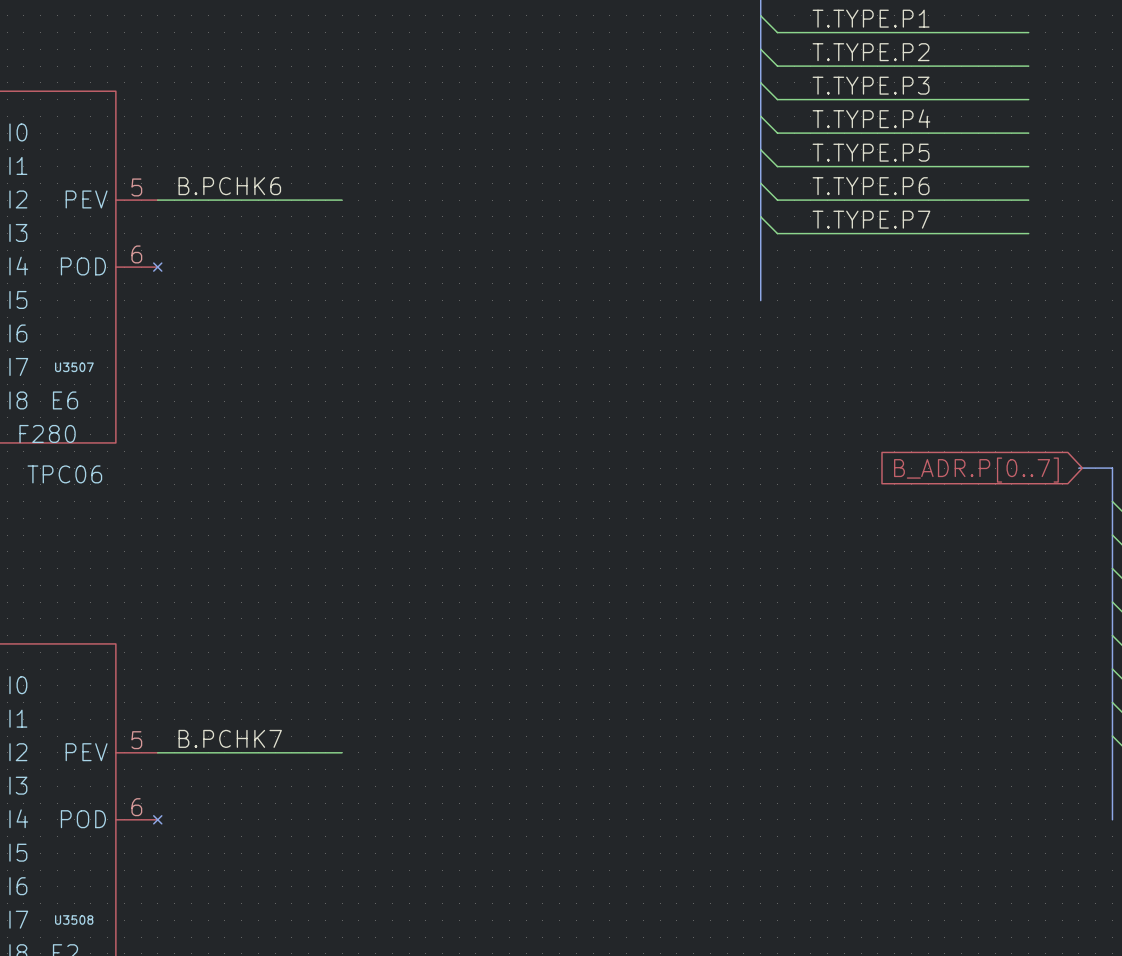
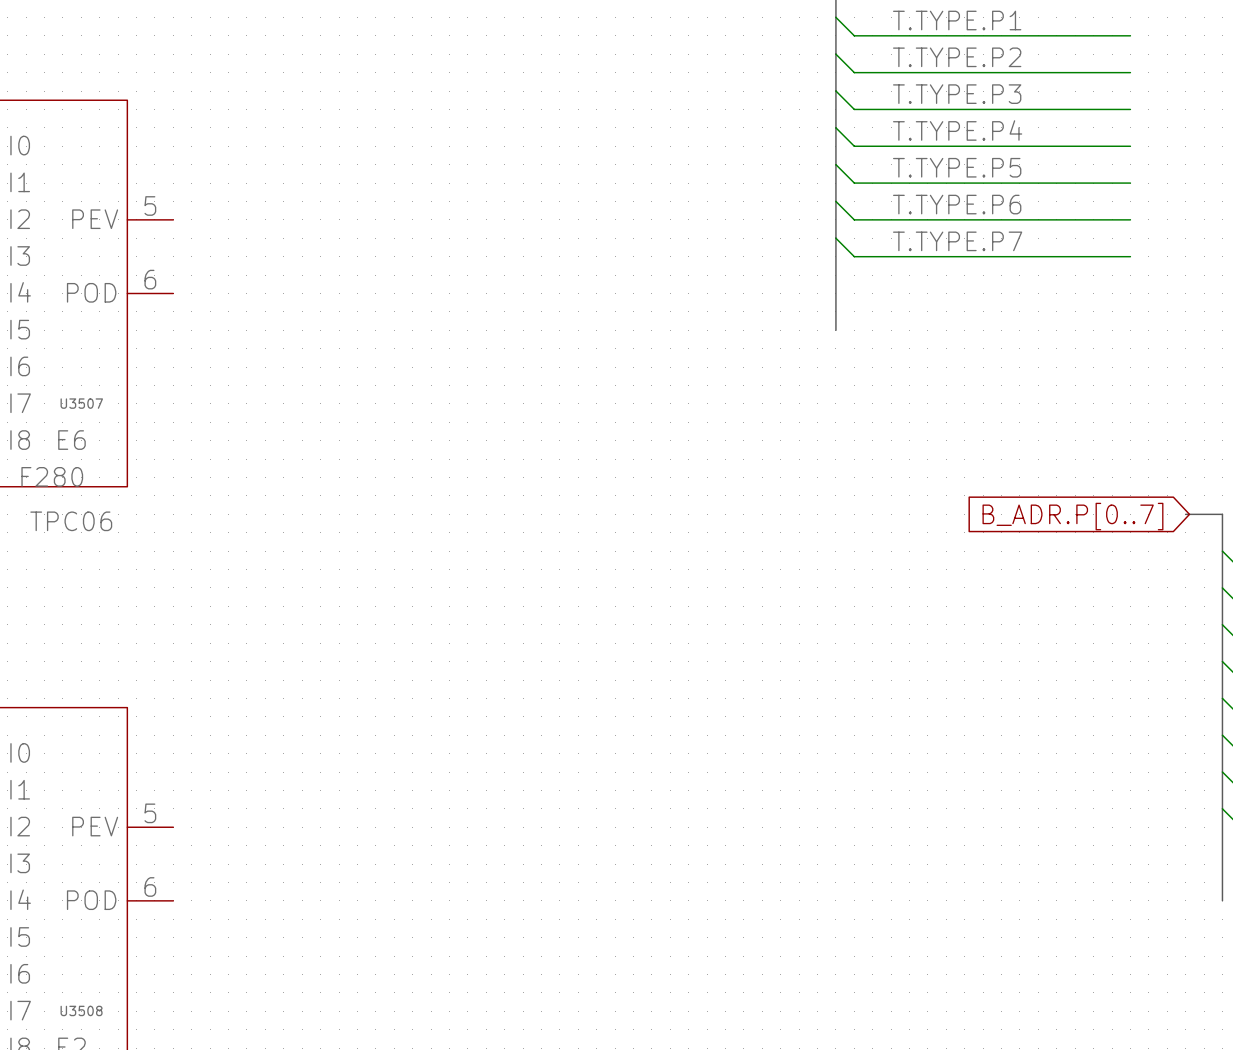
label: B.PCHK6 (229, 186) -> none
wire: (157, 200) (342, 200) -> none
no-connect mark: (157, 267) -> none
label: B.PCHK7 (230, 738) -> none
wire: (157, 752) (342, 752) -> none
no-connect mark: (157, 819) -> none

